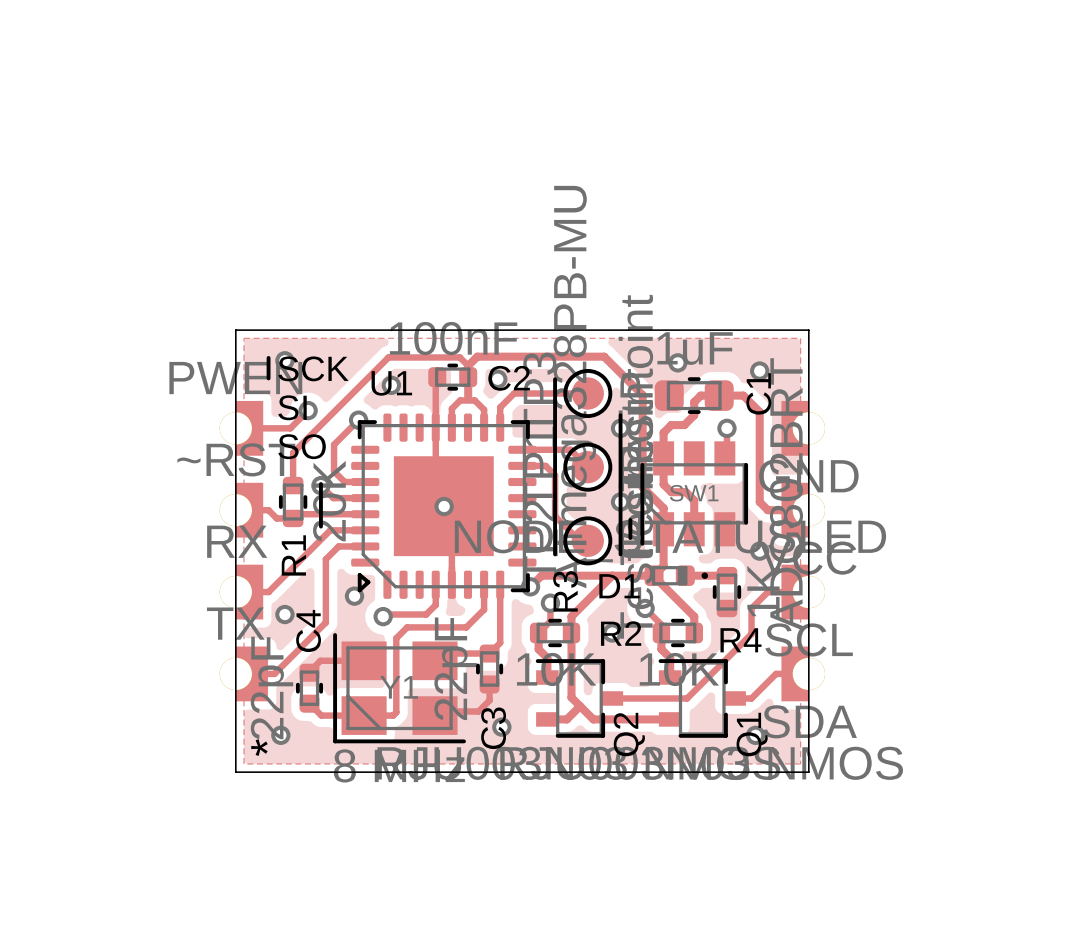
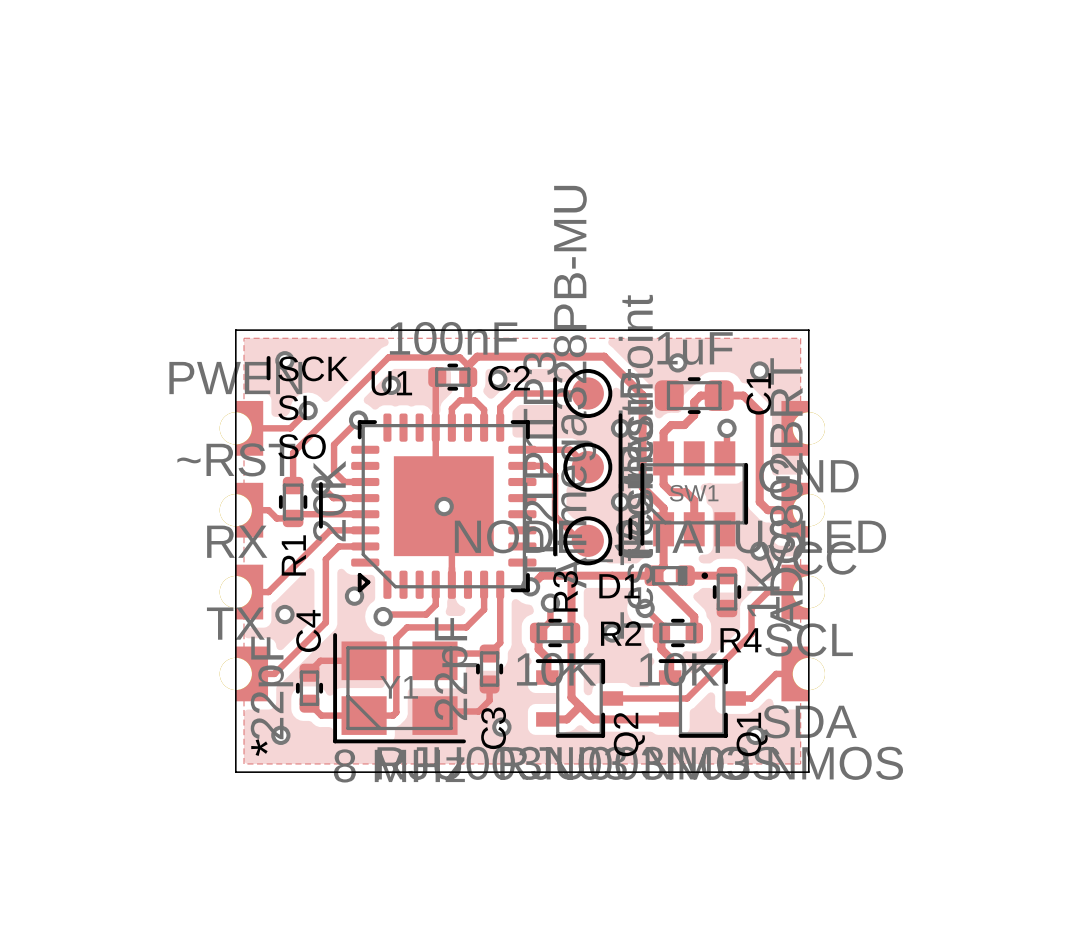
track: (612, 575) (571, 616) -> (571, 575) (571, 616)

